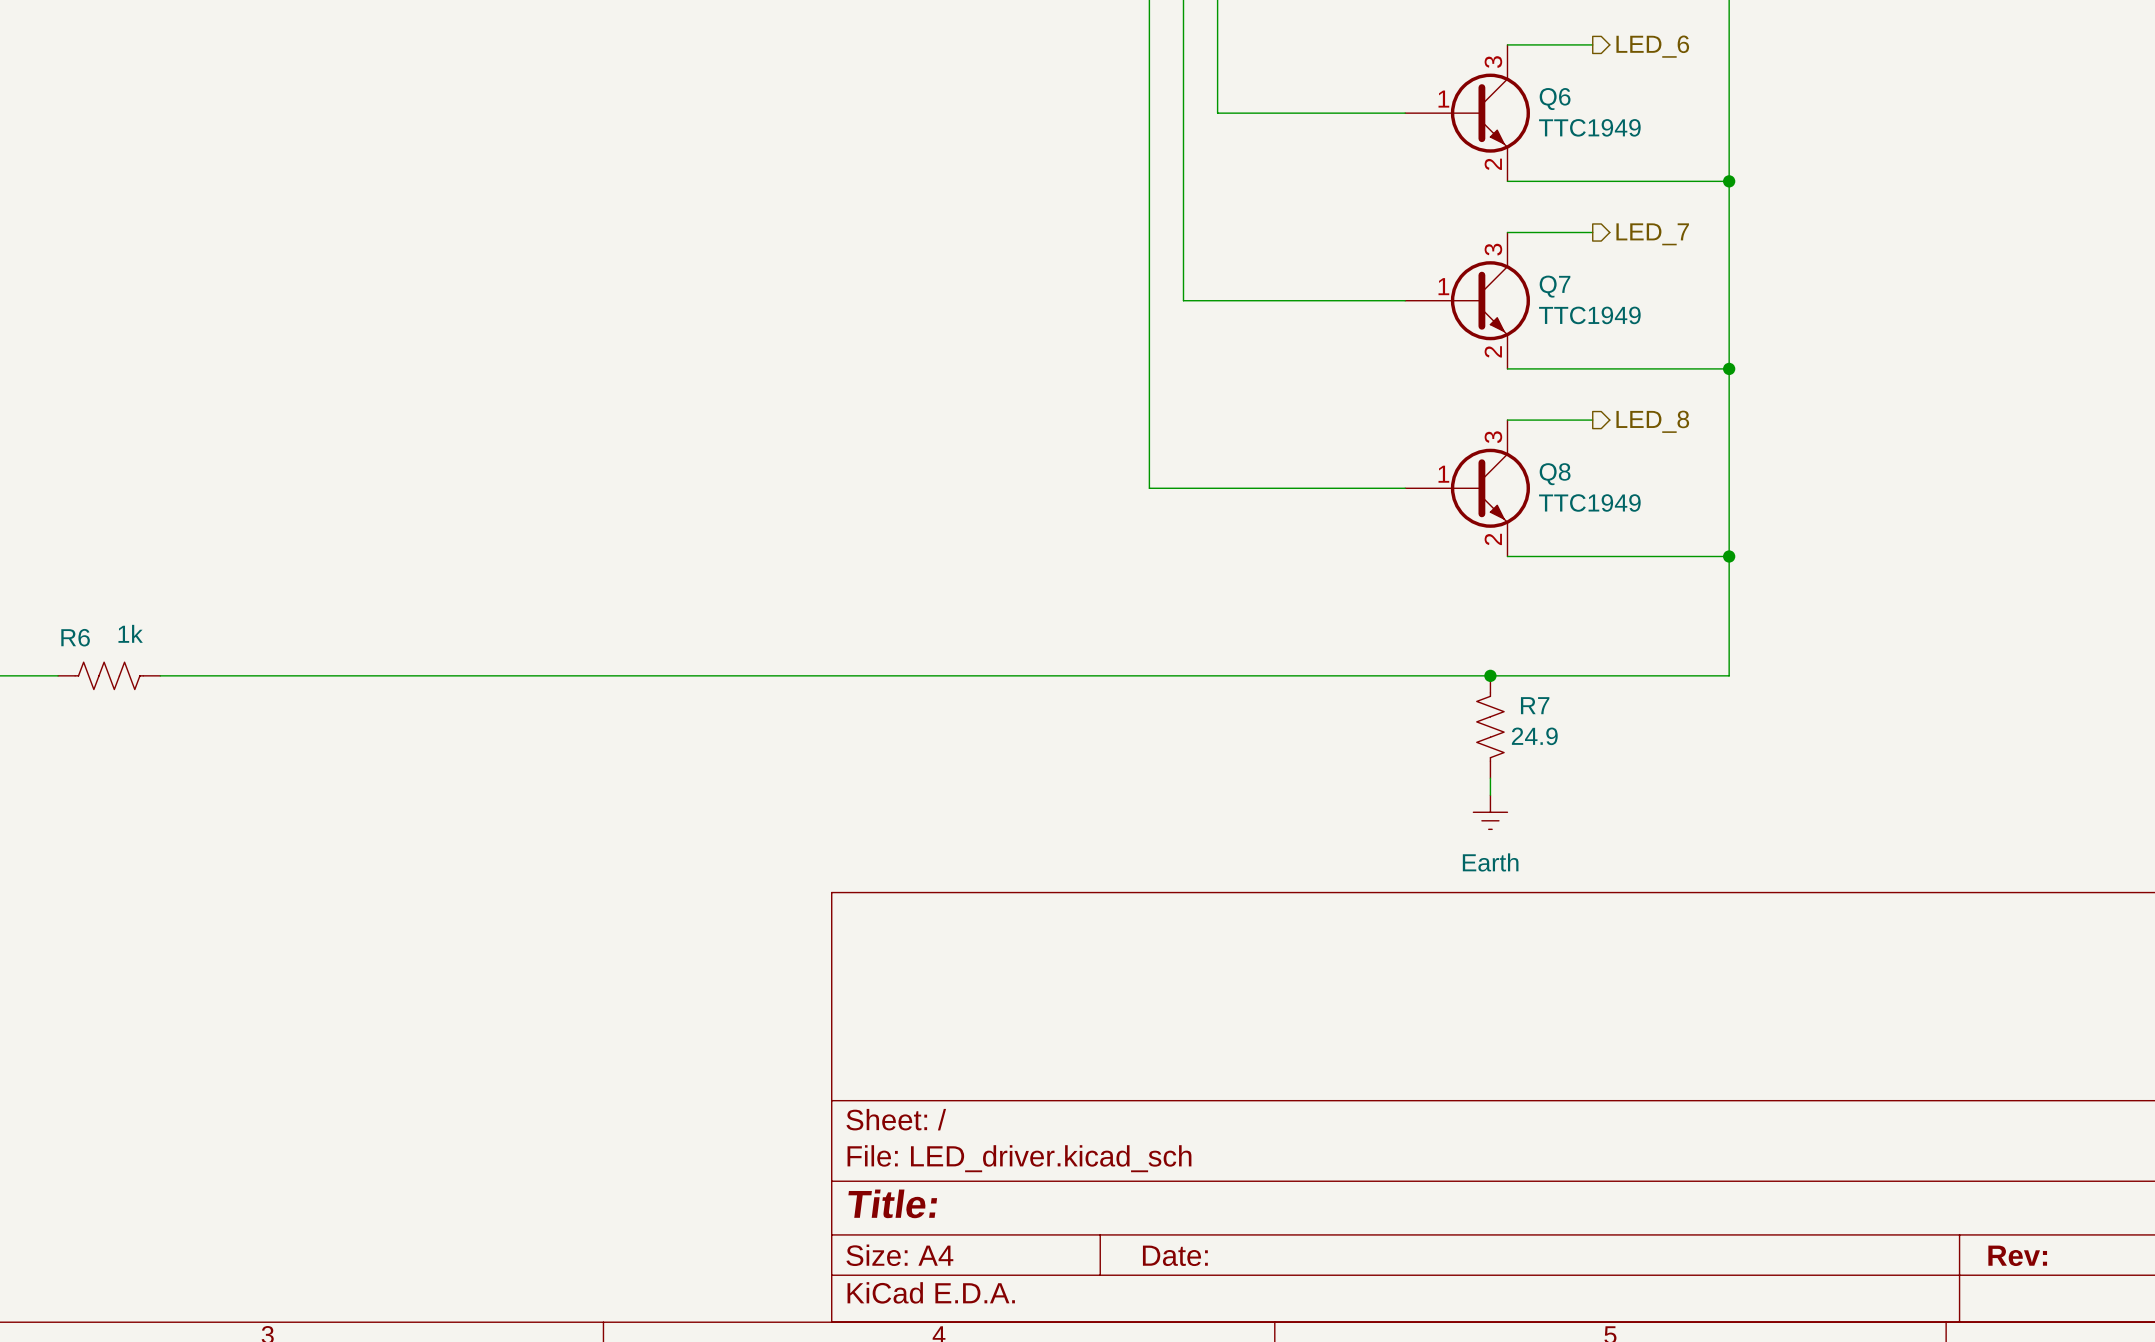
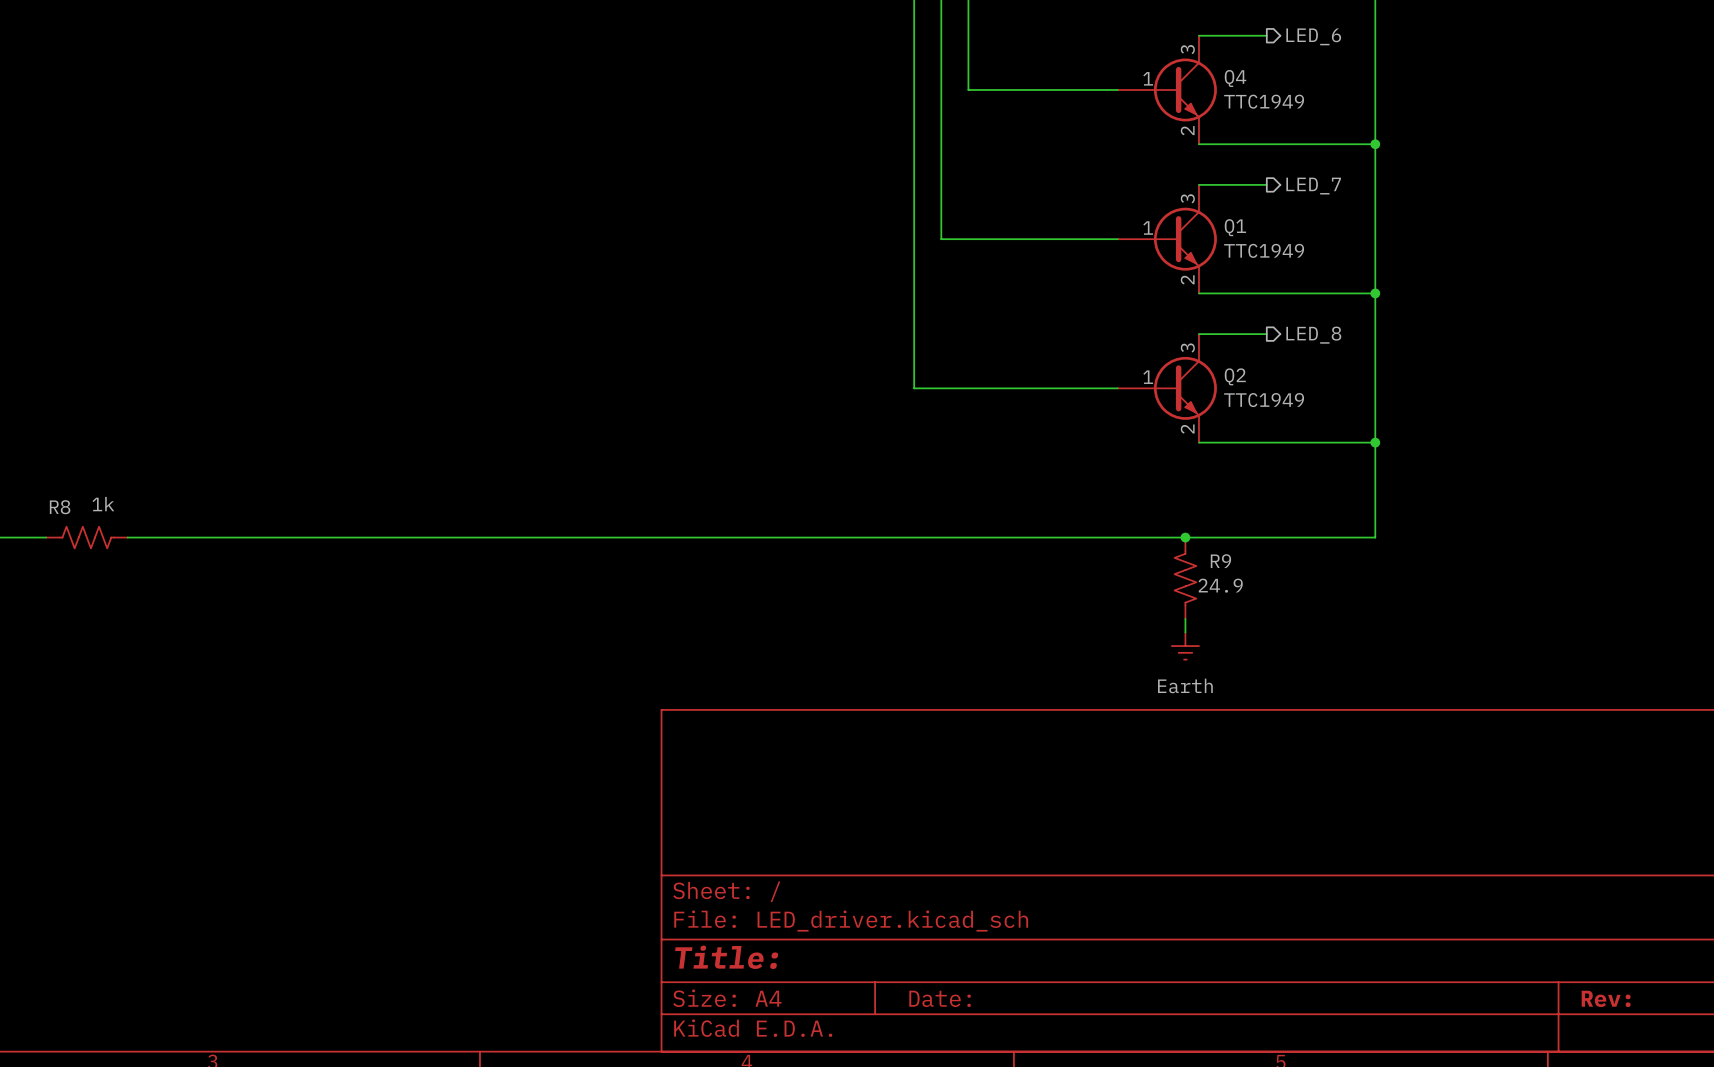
Q6 name: Q6 (1555, 99) -> Q4 (1235, 78)
Q7 name: Q7 (1555, 286) -> Q1 (1235, 227)
Q8 name: Q8 (1555, 474) -> Q2 (1235, 376)
R6 name: R6 (75, 637) -> R8 (60, 507)
R7 name: R7 (1535, 705) -> R9 (1220, 561)

